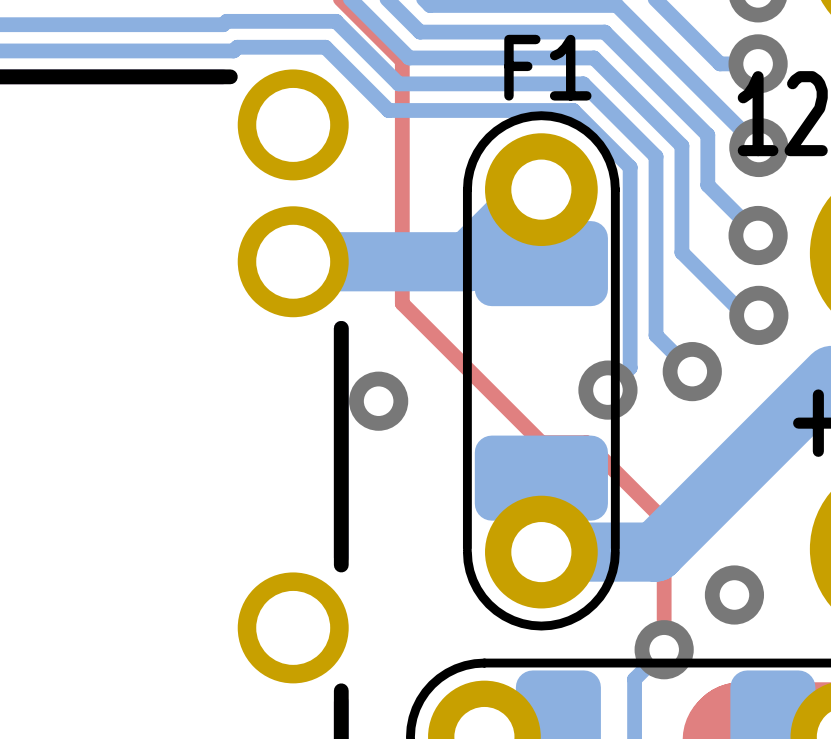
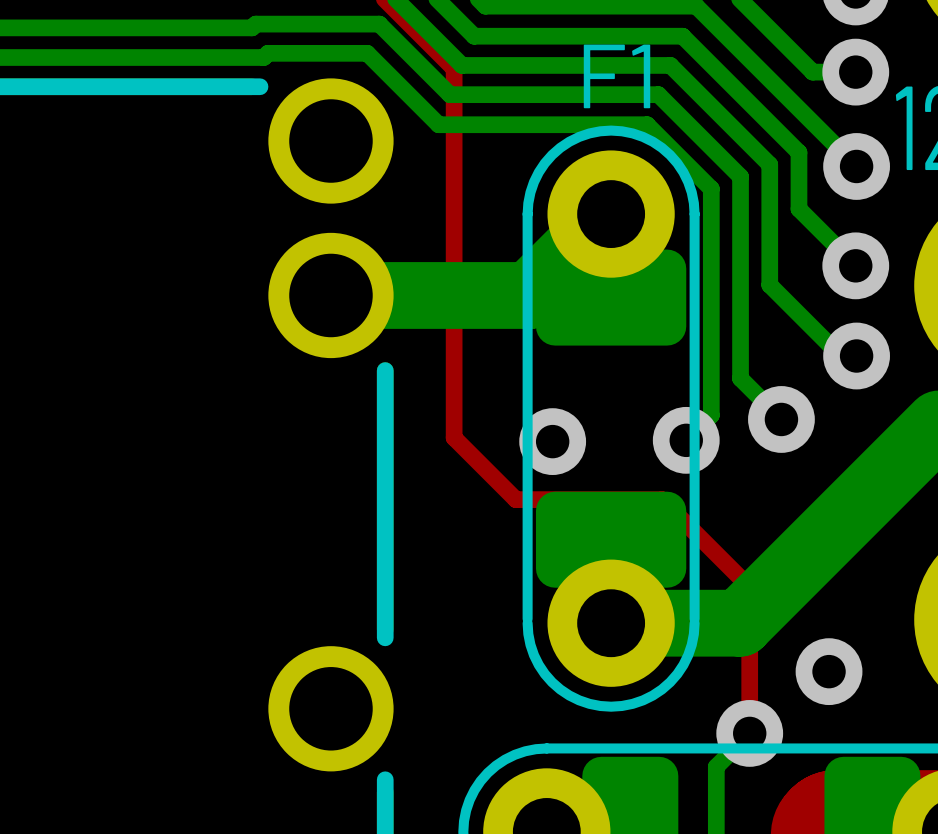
top track: (402, 303) (541, 442) -> (454, 342) (454, 437) (515, 499) (611, 499)
via position: (378, 401) -> (552, 441)

